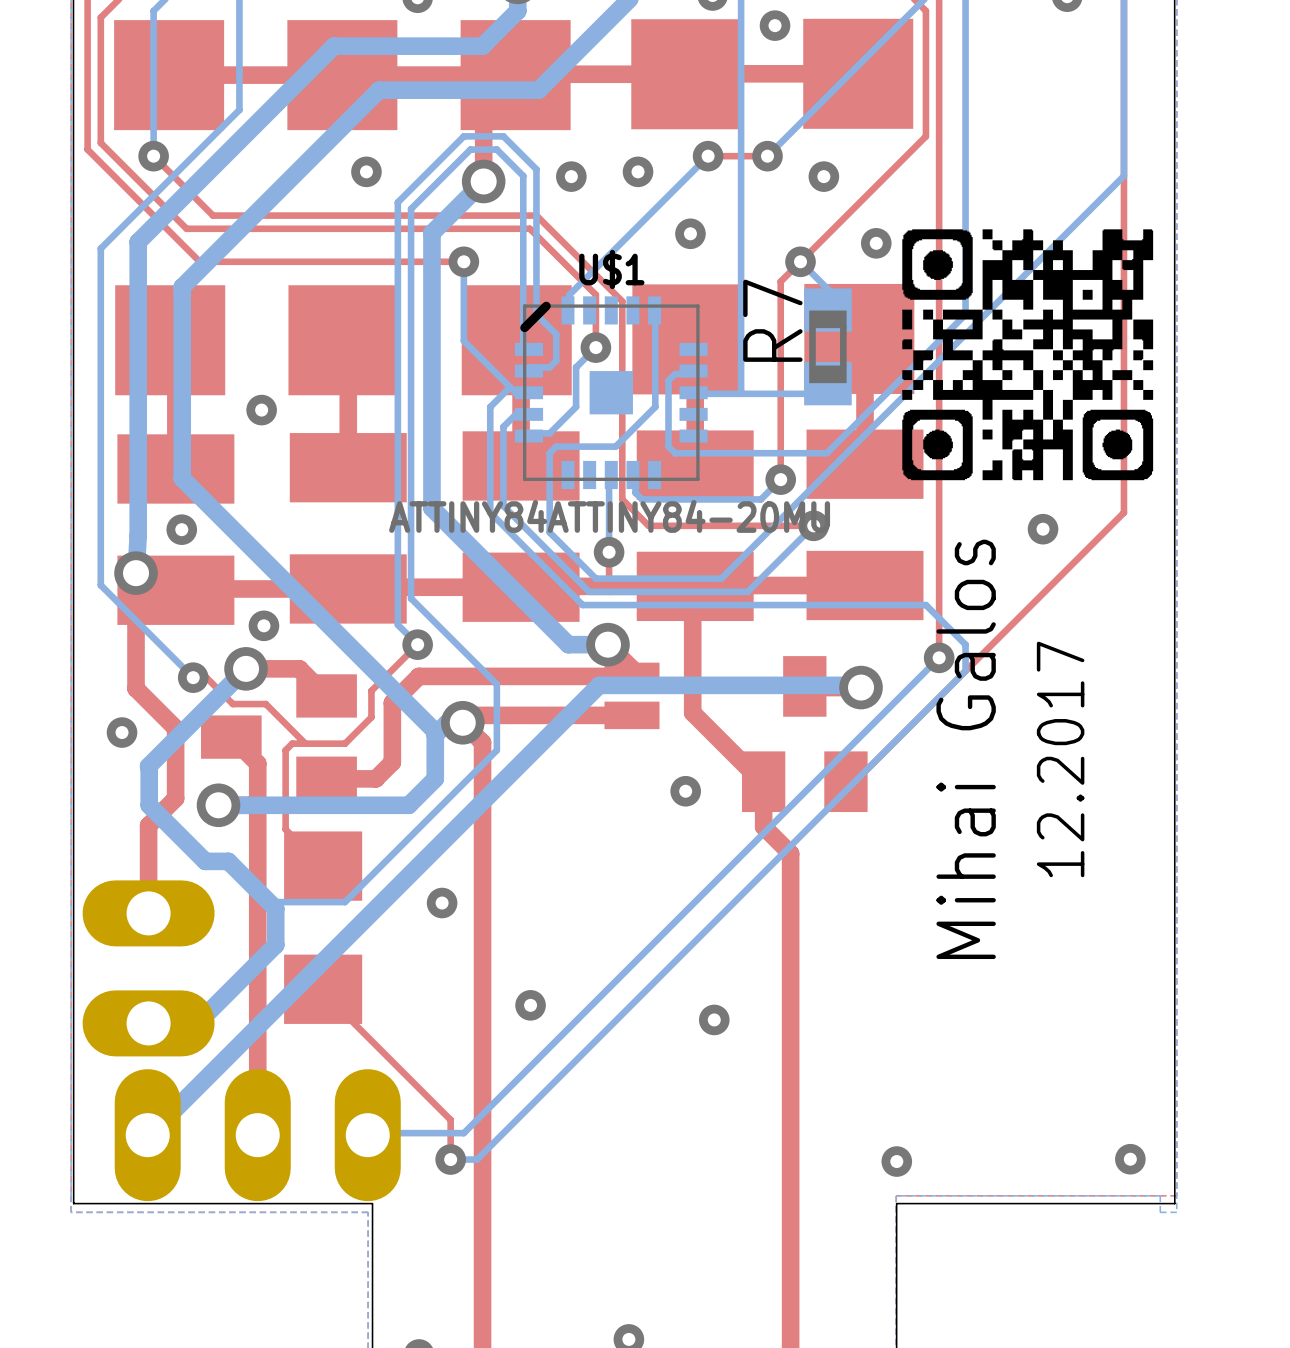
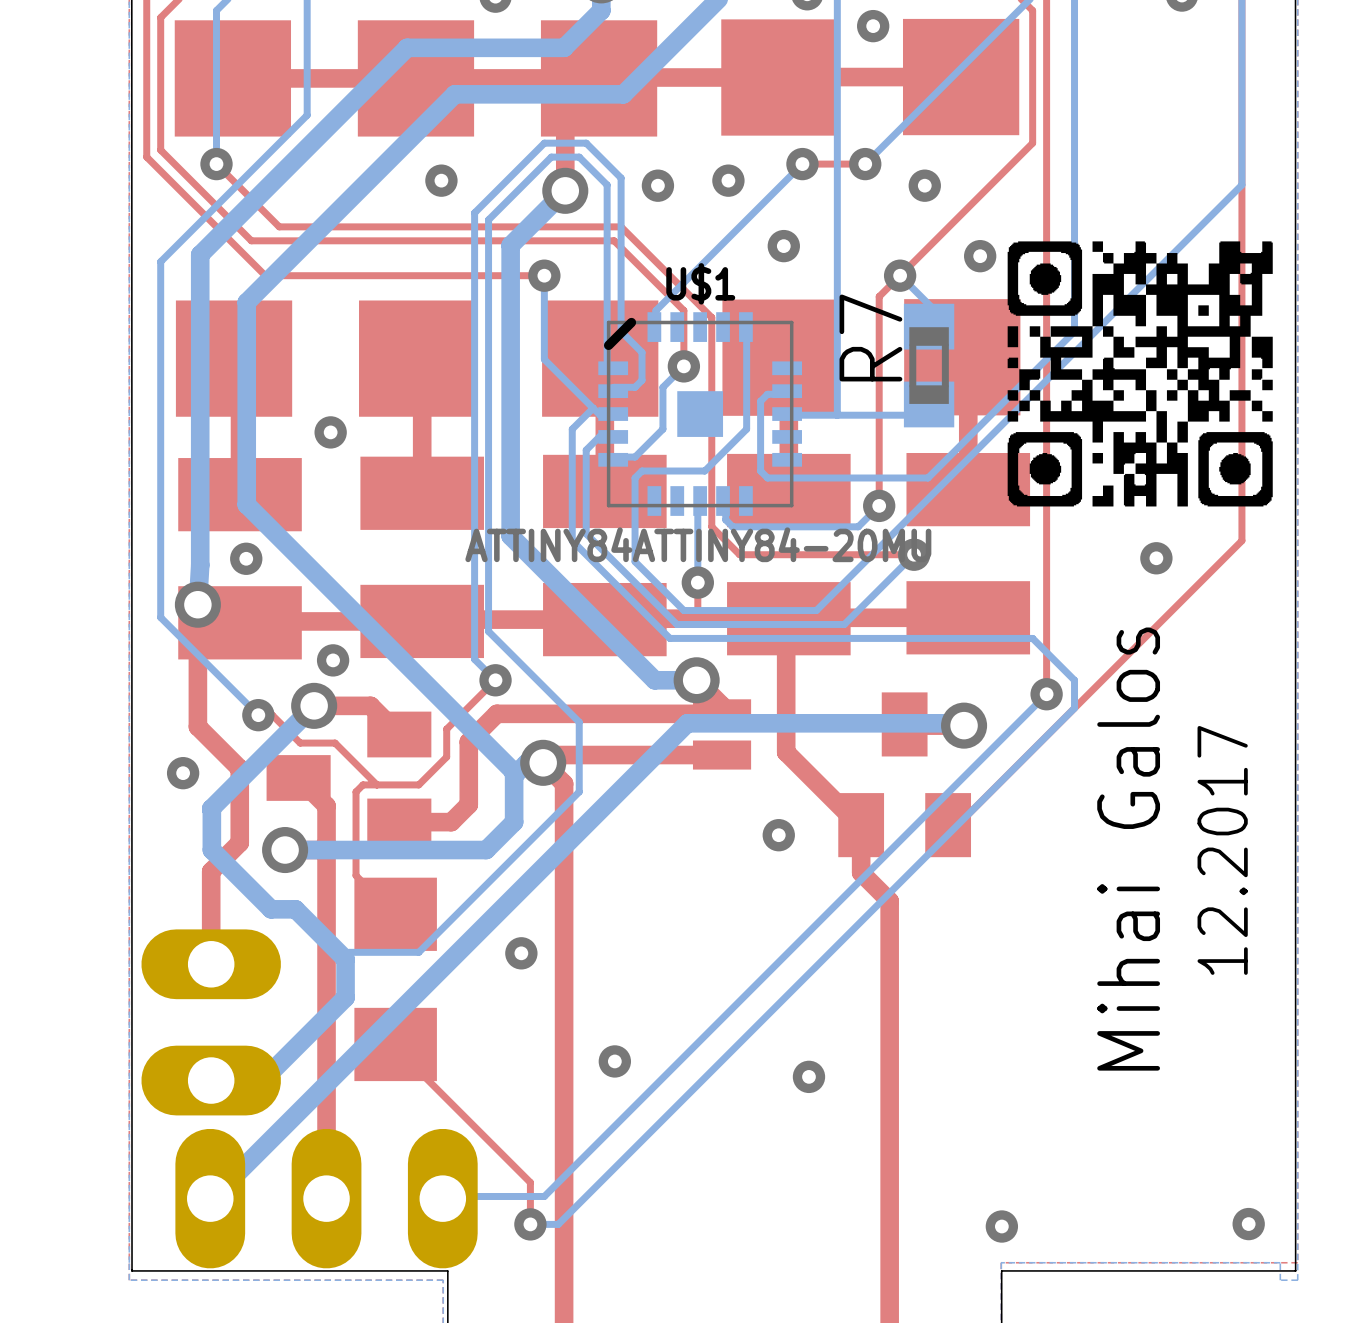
text position: Mihai Galos (966, 749) -> Mihai Galos (1128, 849)
text position: 12.2017 (1060, 759) -> 12.2017 (1222, 850)

